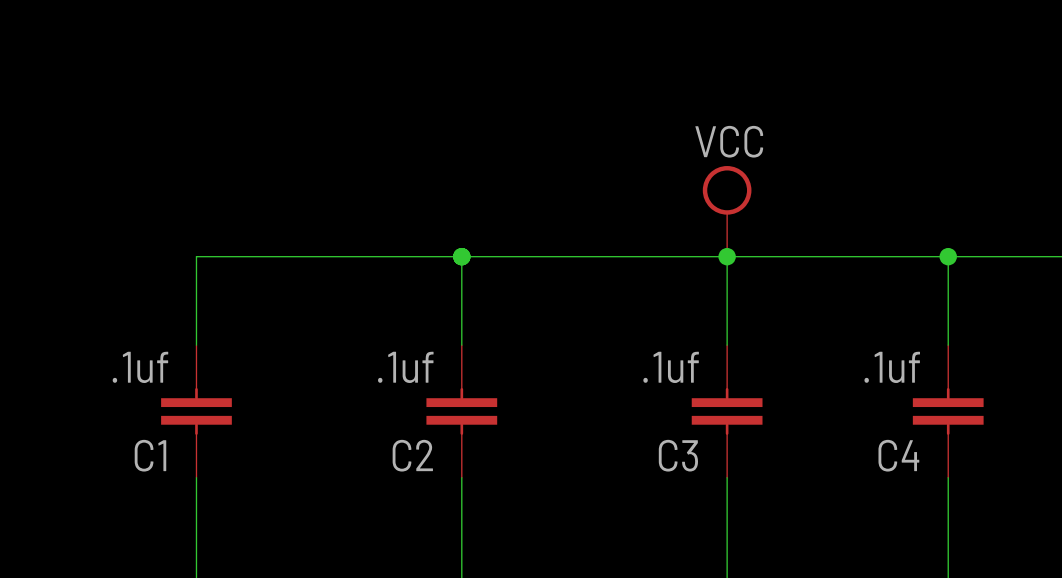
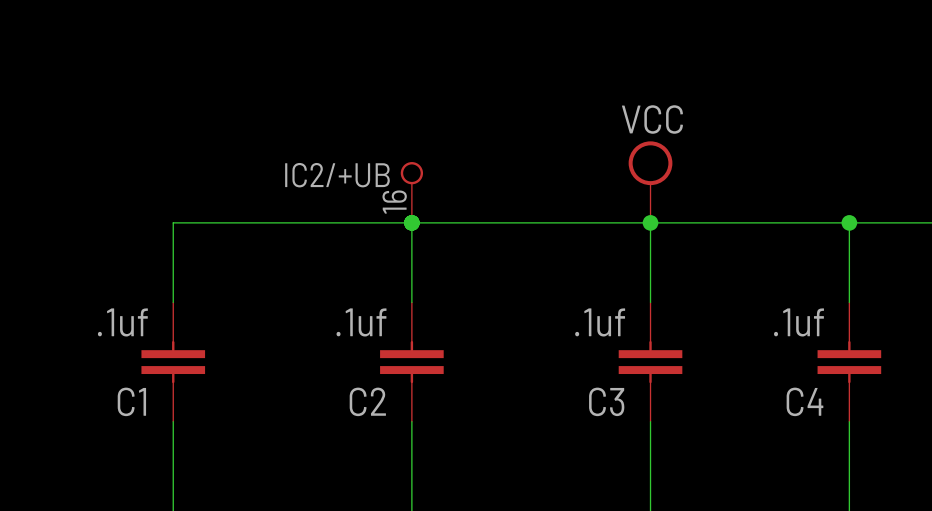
IC2/+UB: none -> (411, 192)

